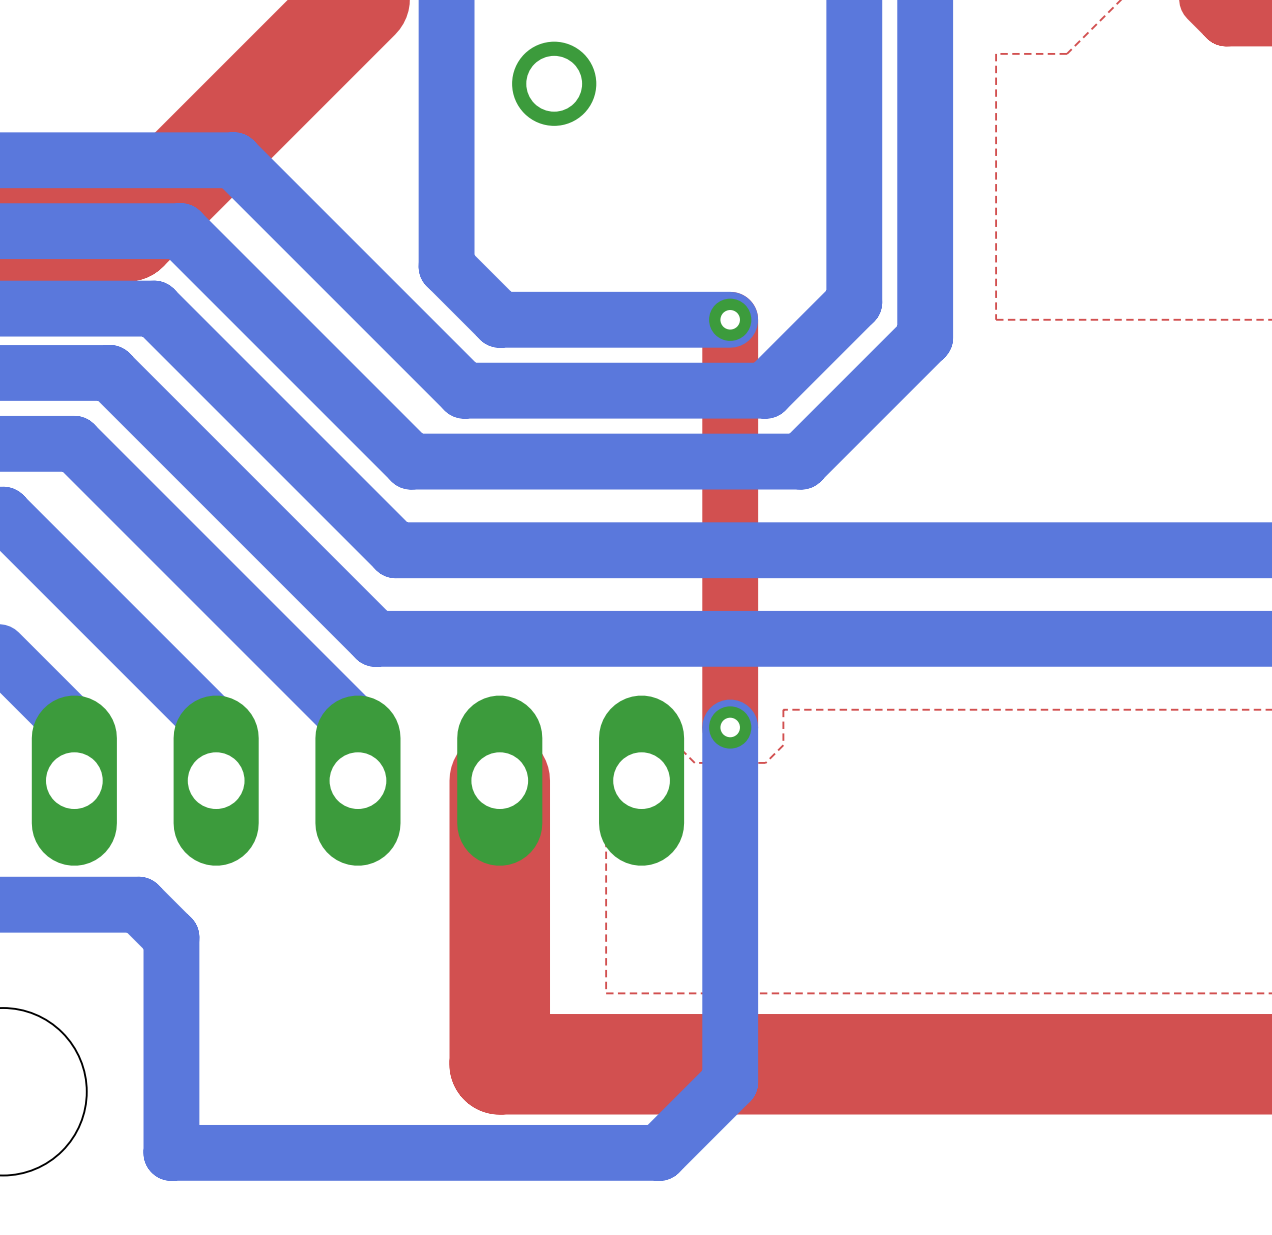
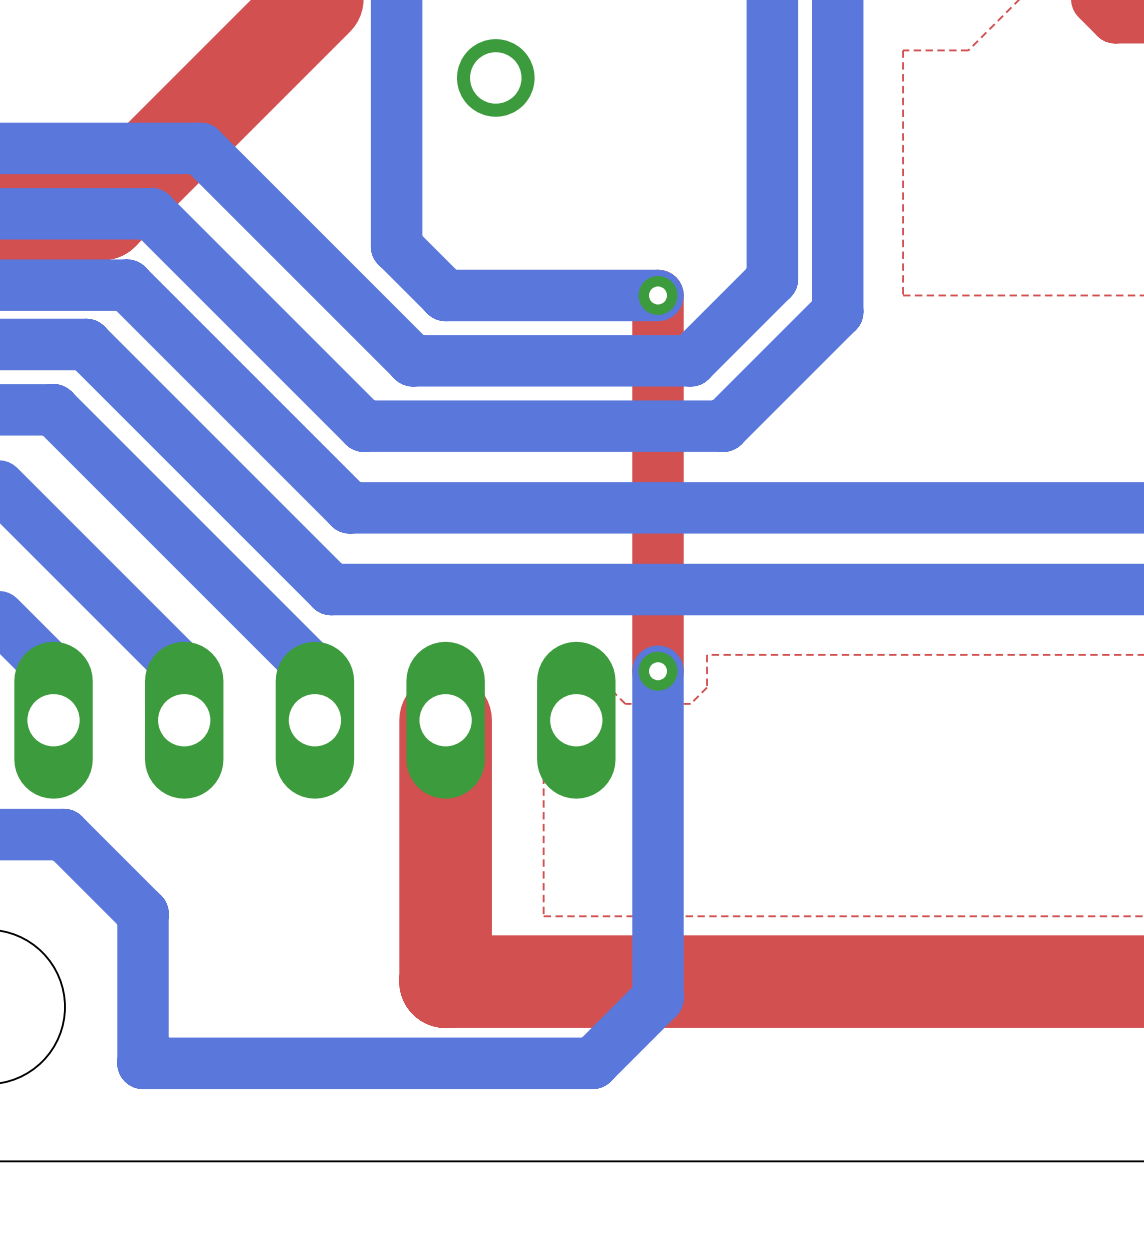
bottom track: (85, 904) (138, 904) (171, 937) (171, 990) -> (63, 834) (143, 913)

